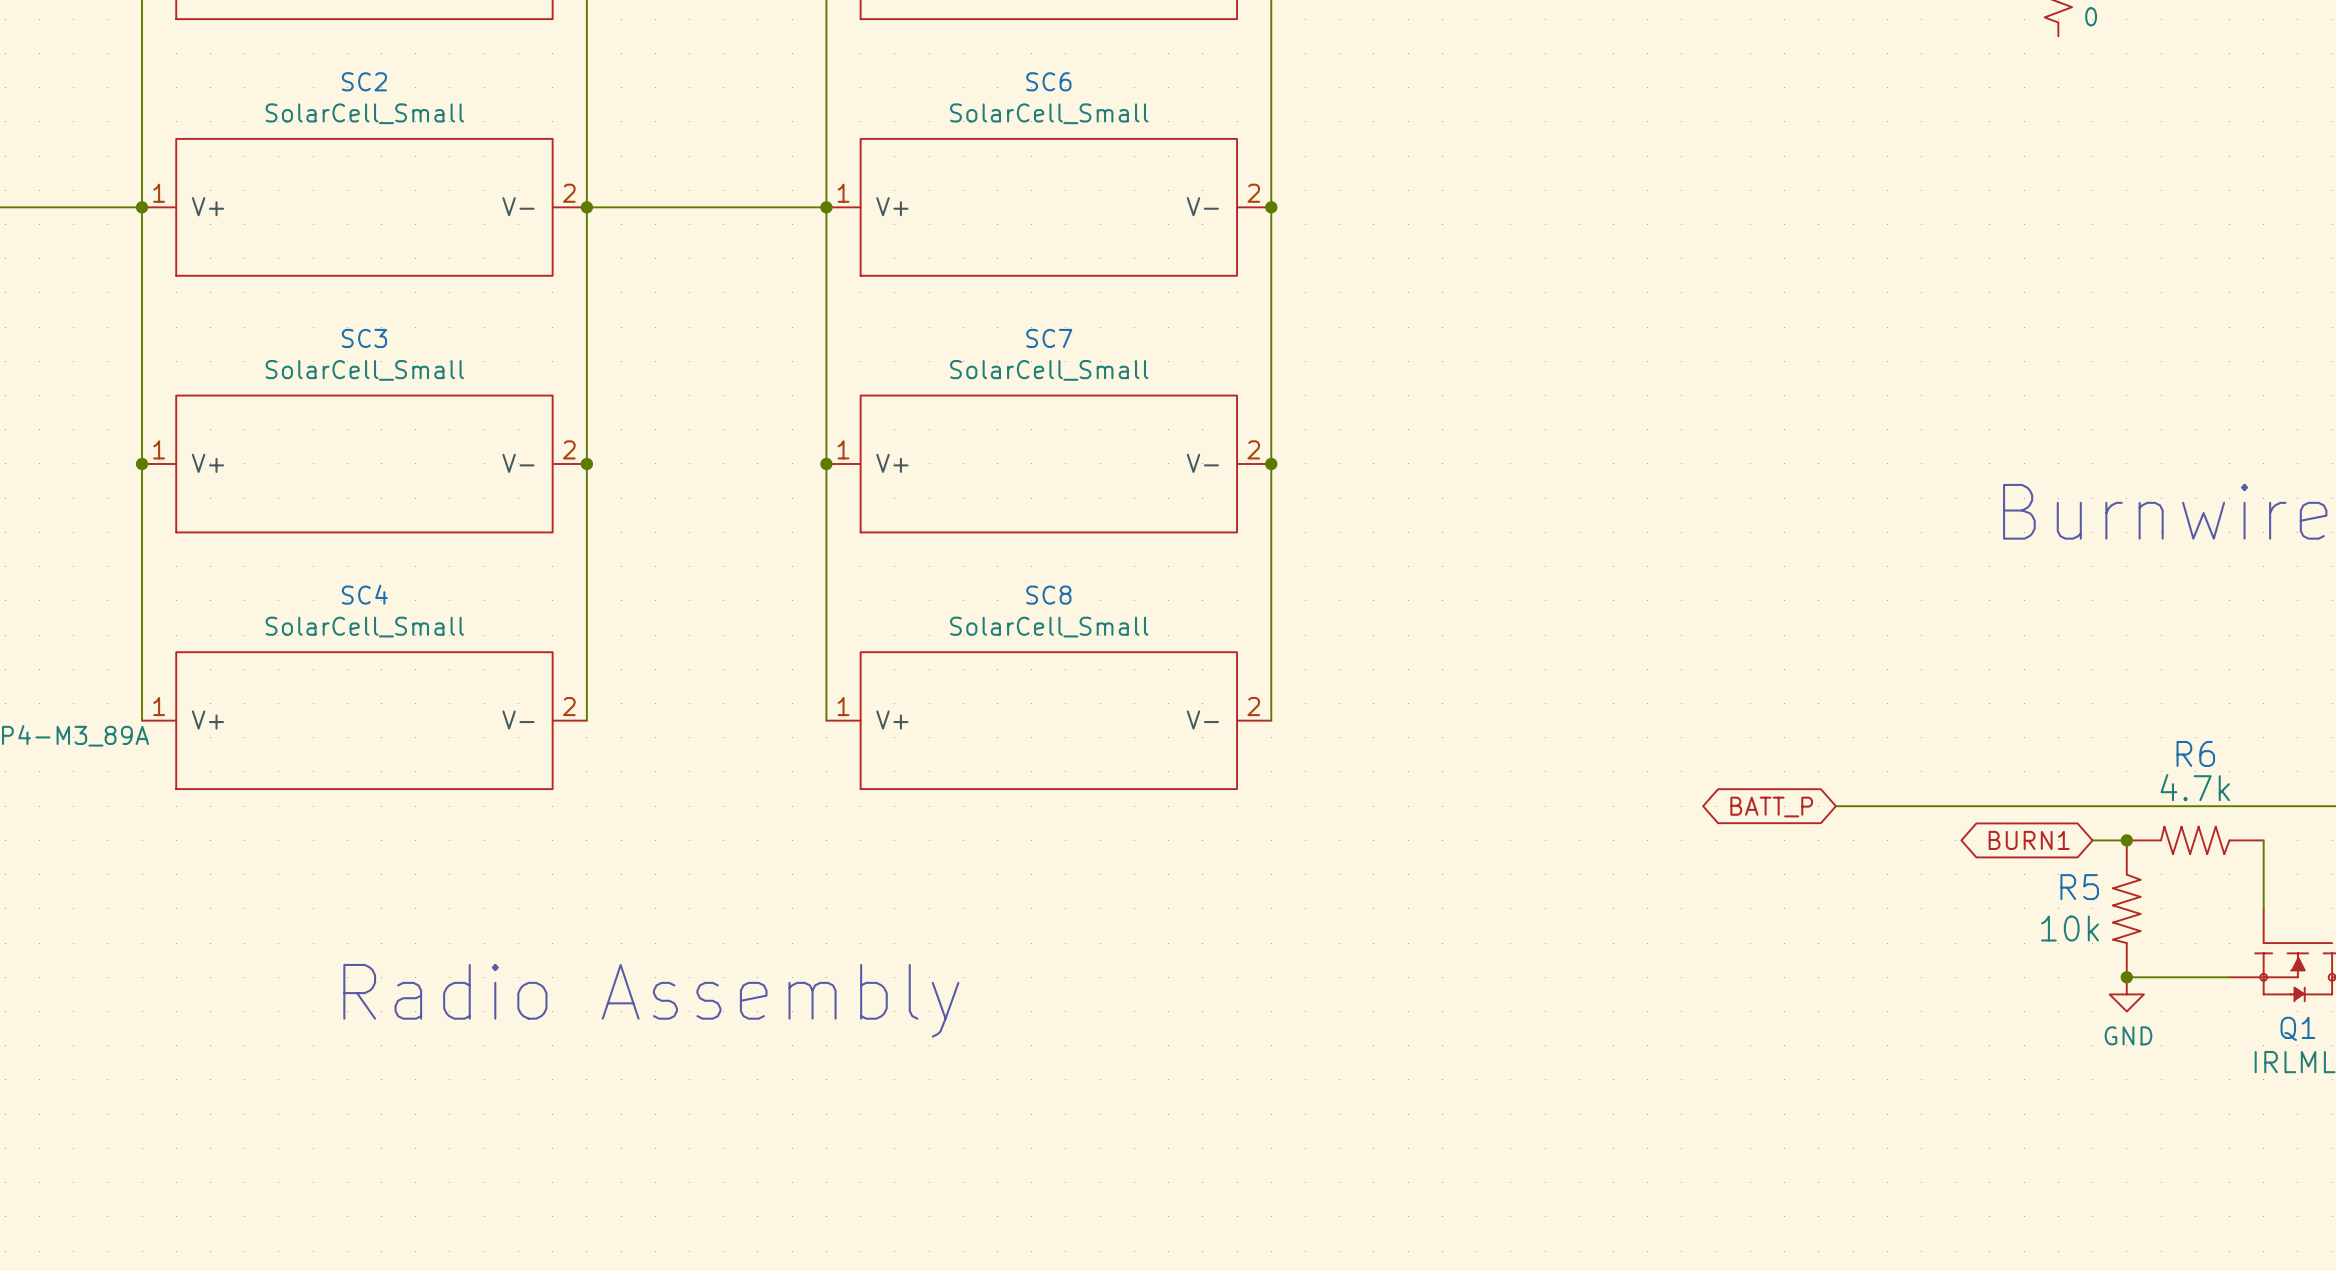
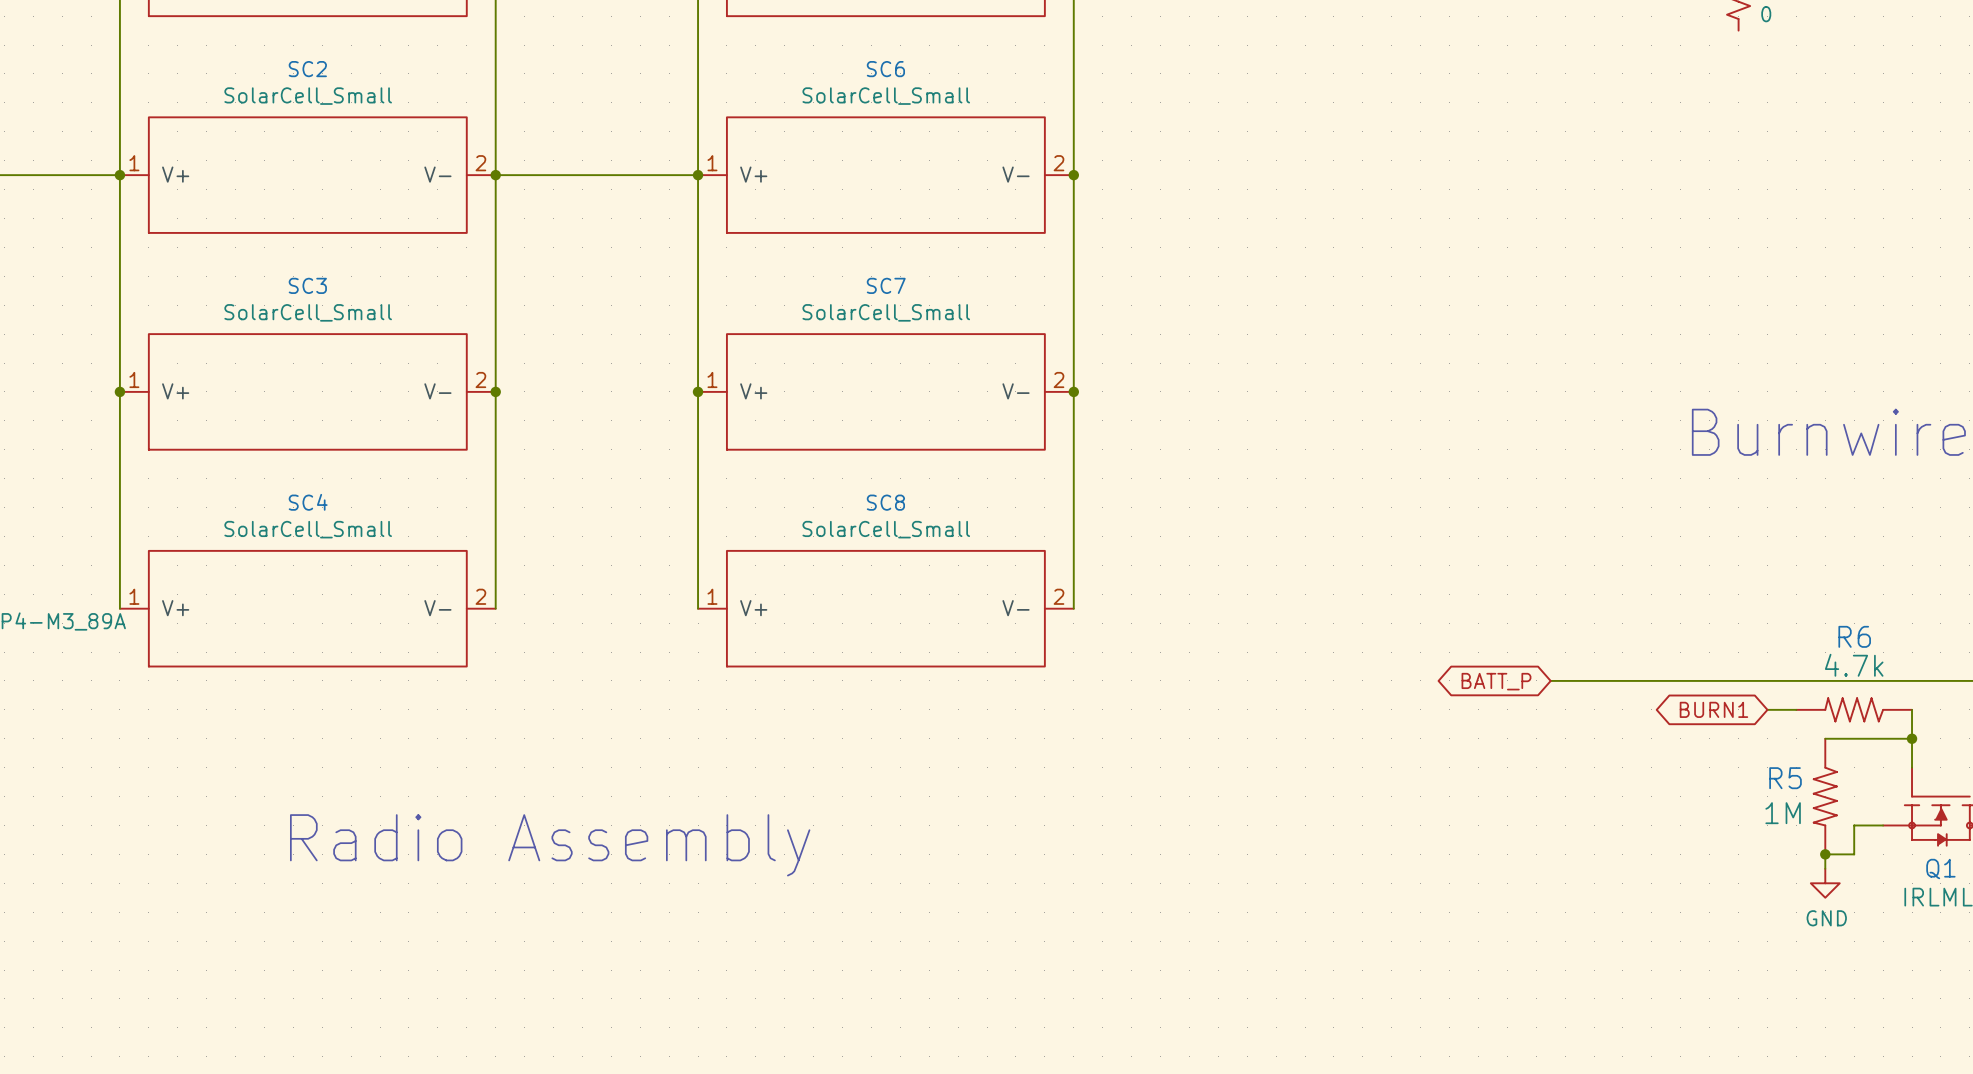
junction: (2126, 840) -> none
wire: none -> (1825, 738) (1912, 738)
junction: none -> (1912, 738)
R5 position: (2126, 908) -> (1825, 796)
R5 value: 10k (2069, 928) -> 1M (1783, 813)
wire: (2126, 977) (2195, 977) -> (1825, 868) (1825, 854) (1854, 854) (1854, 825)
junction position: (2126, 977) -> (1825, 854)
power symbol position: GND (2126, 994) -> GND (1825, 883)

